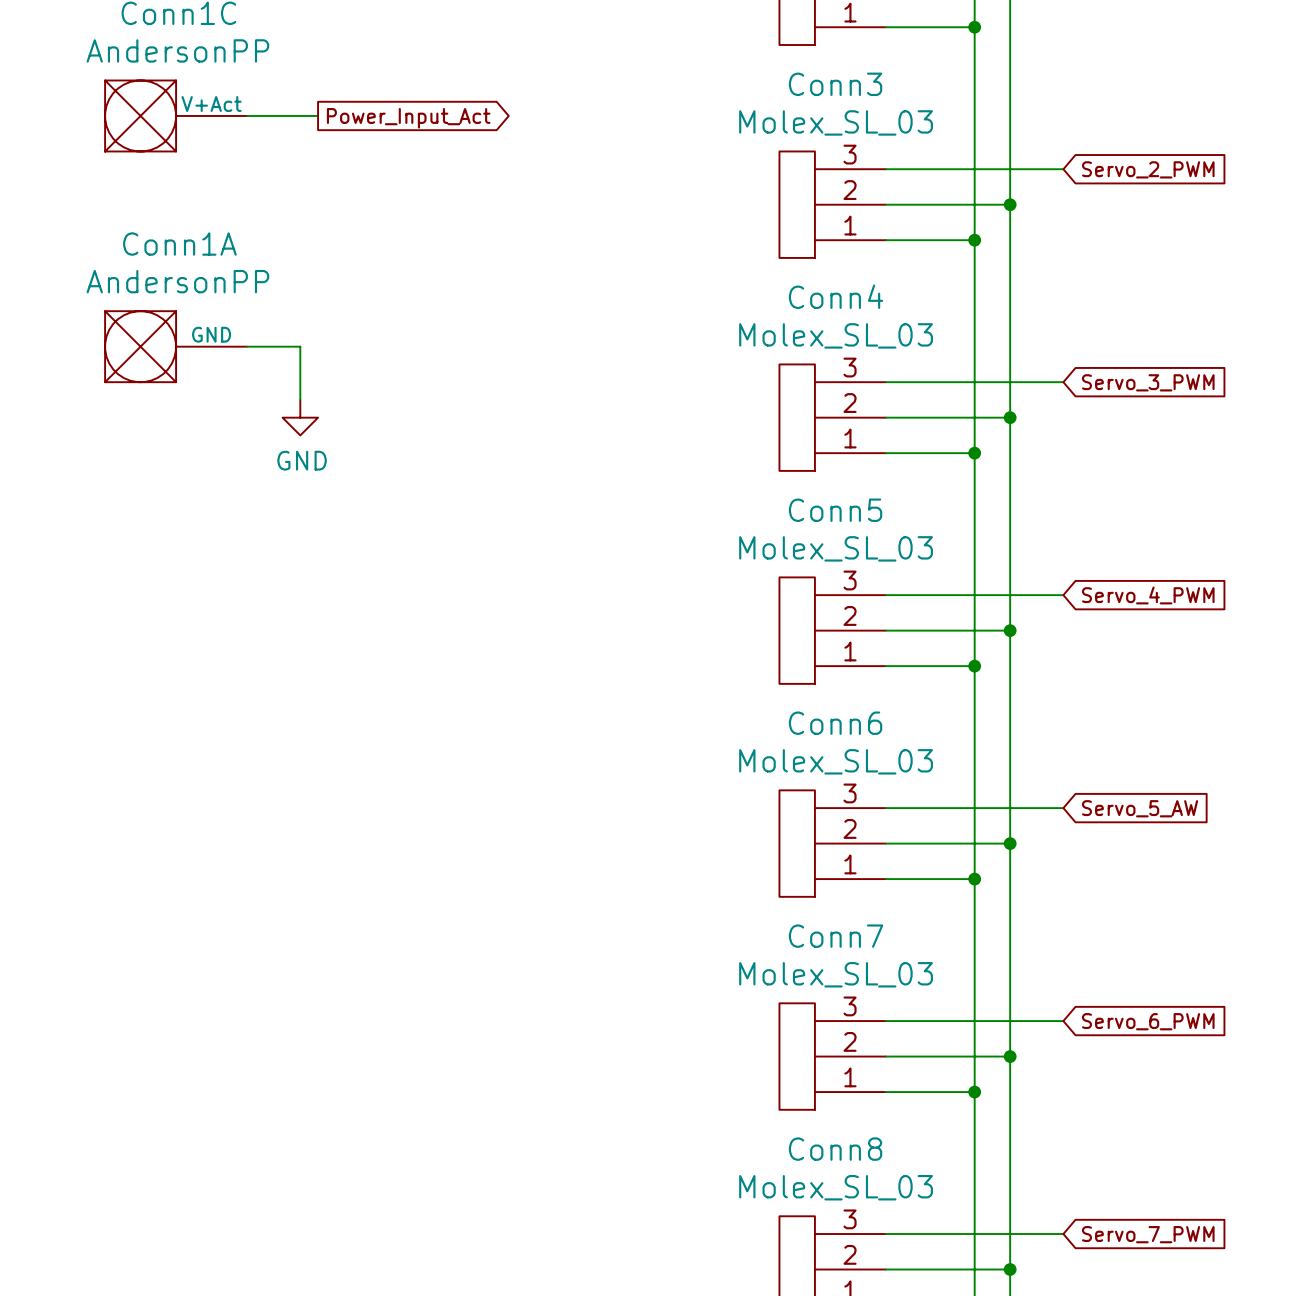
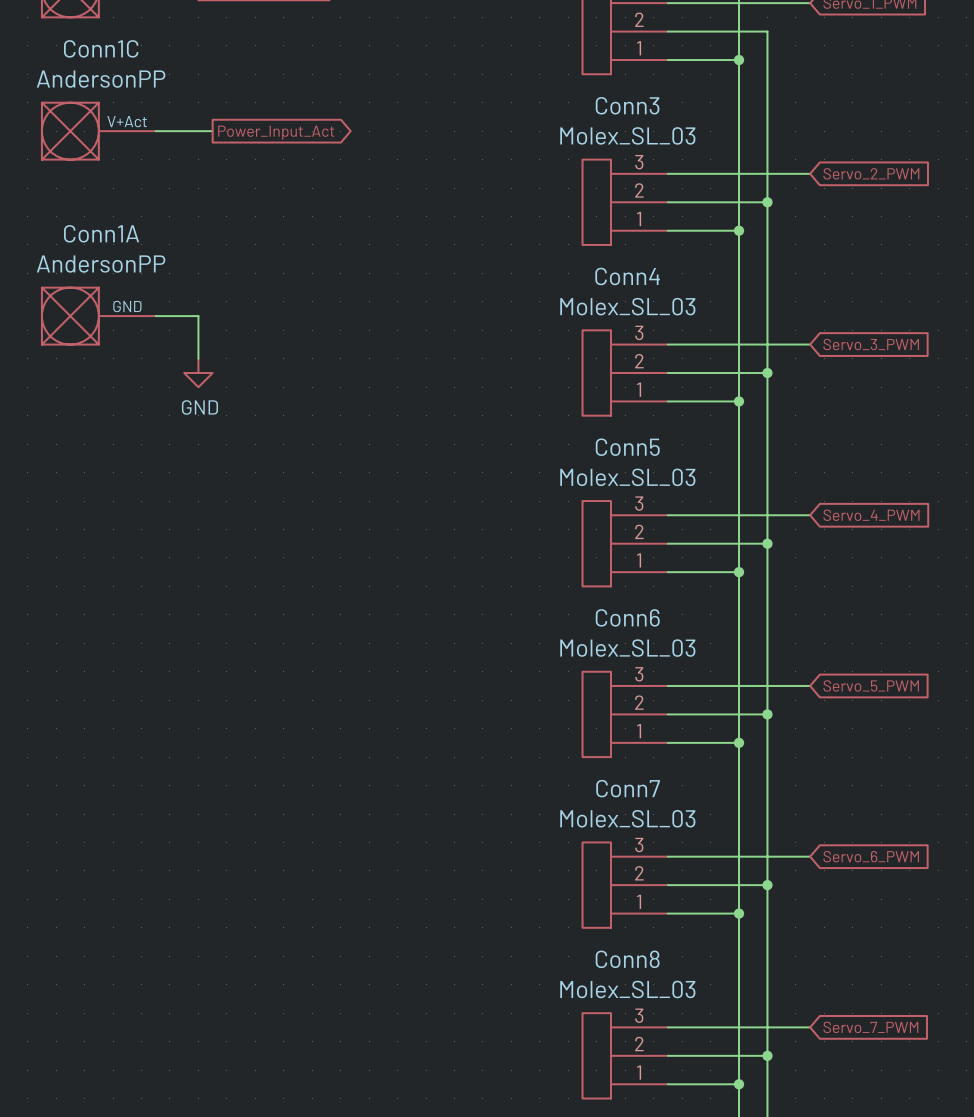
global label: Servo_5_AW (1140, 808) -> Servo_5_PWM (871, 685)

